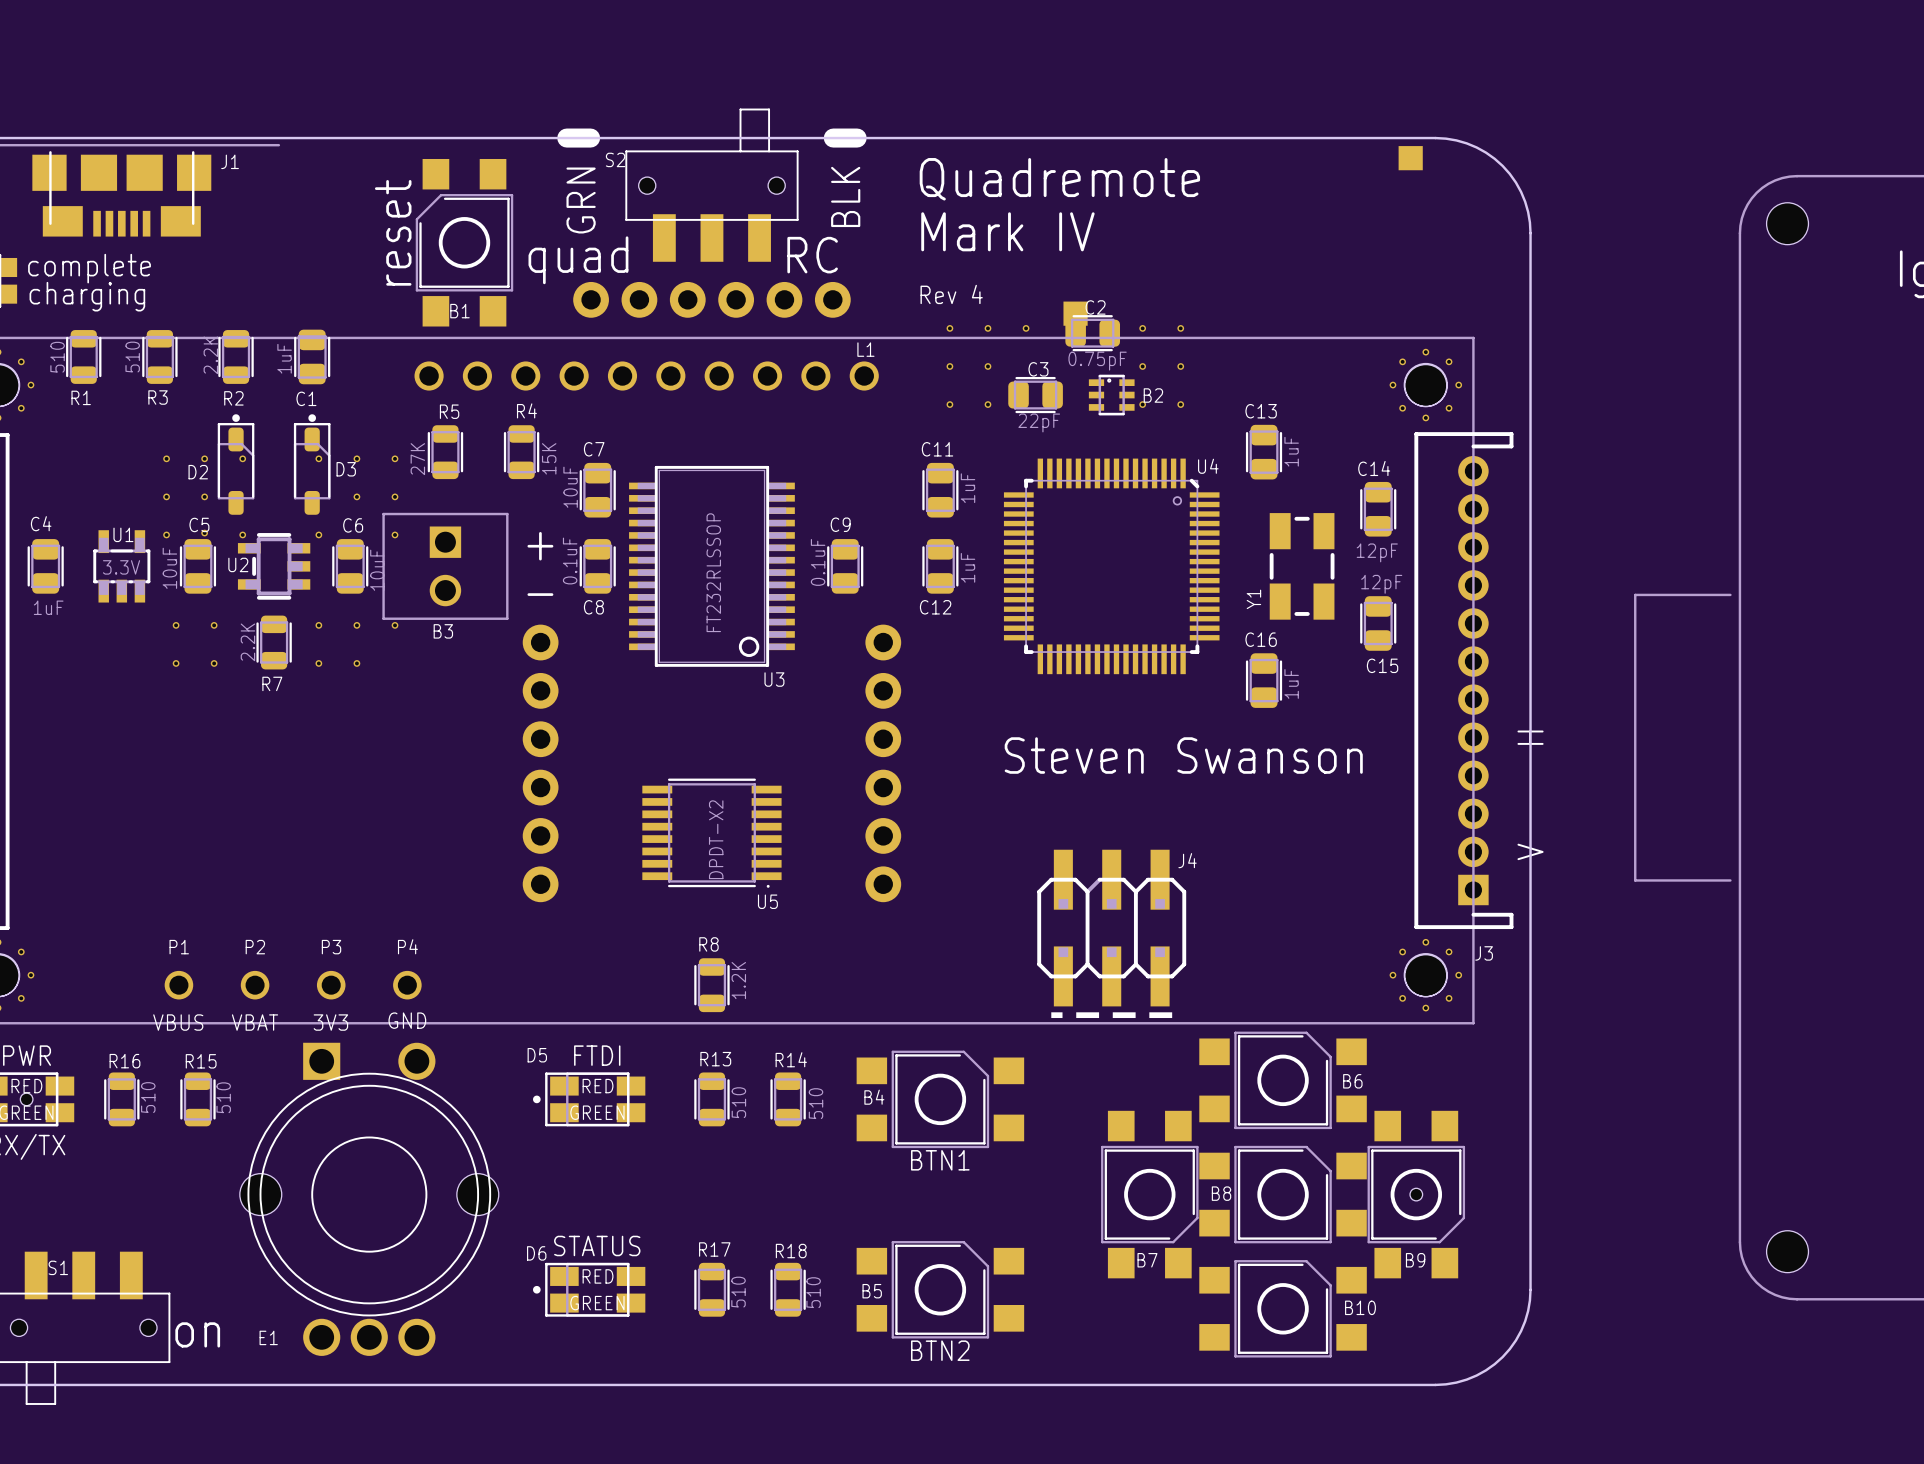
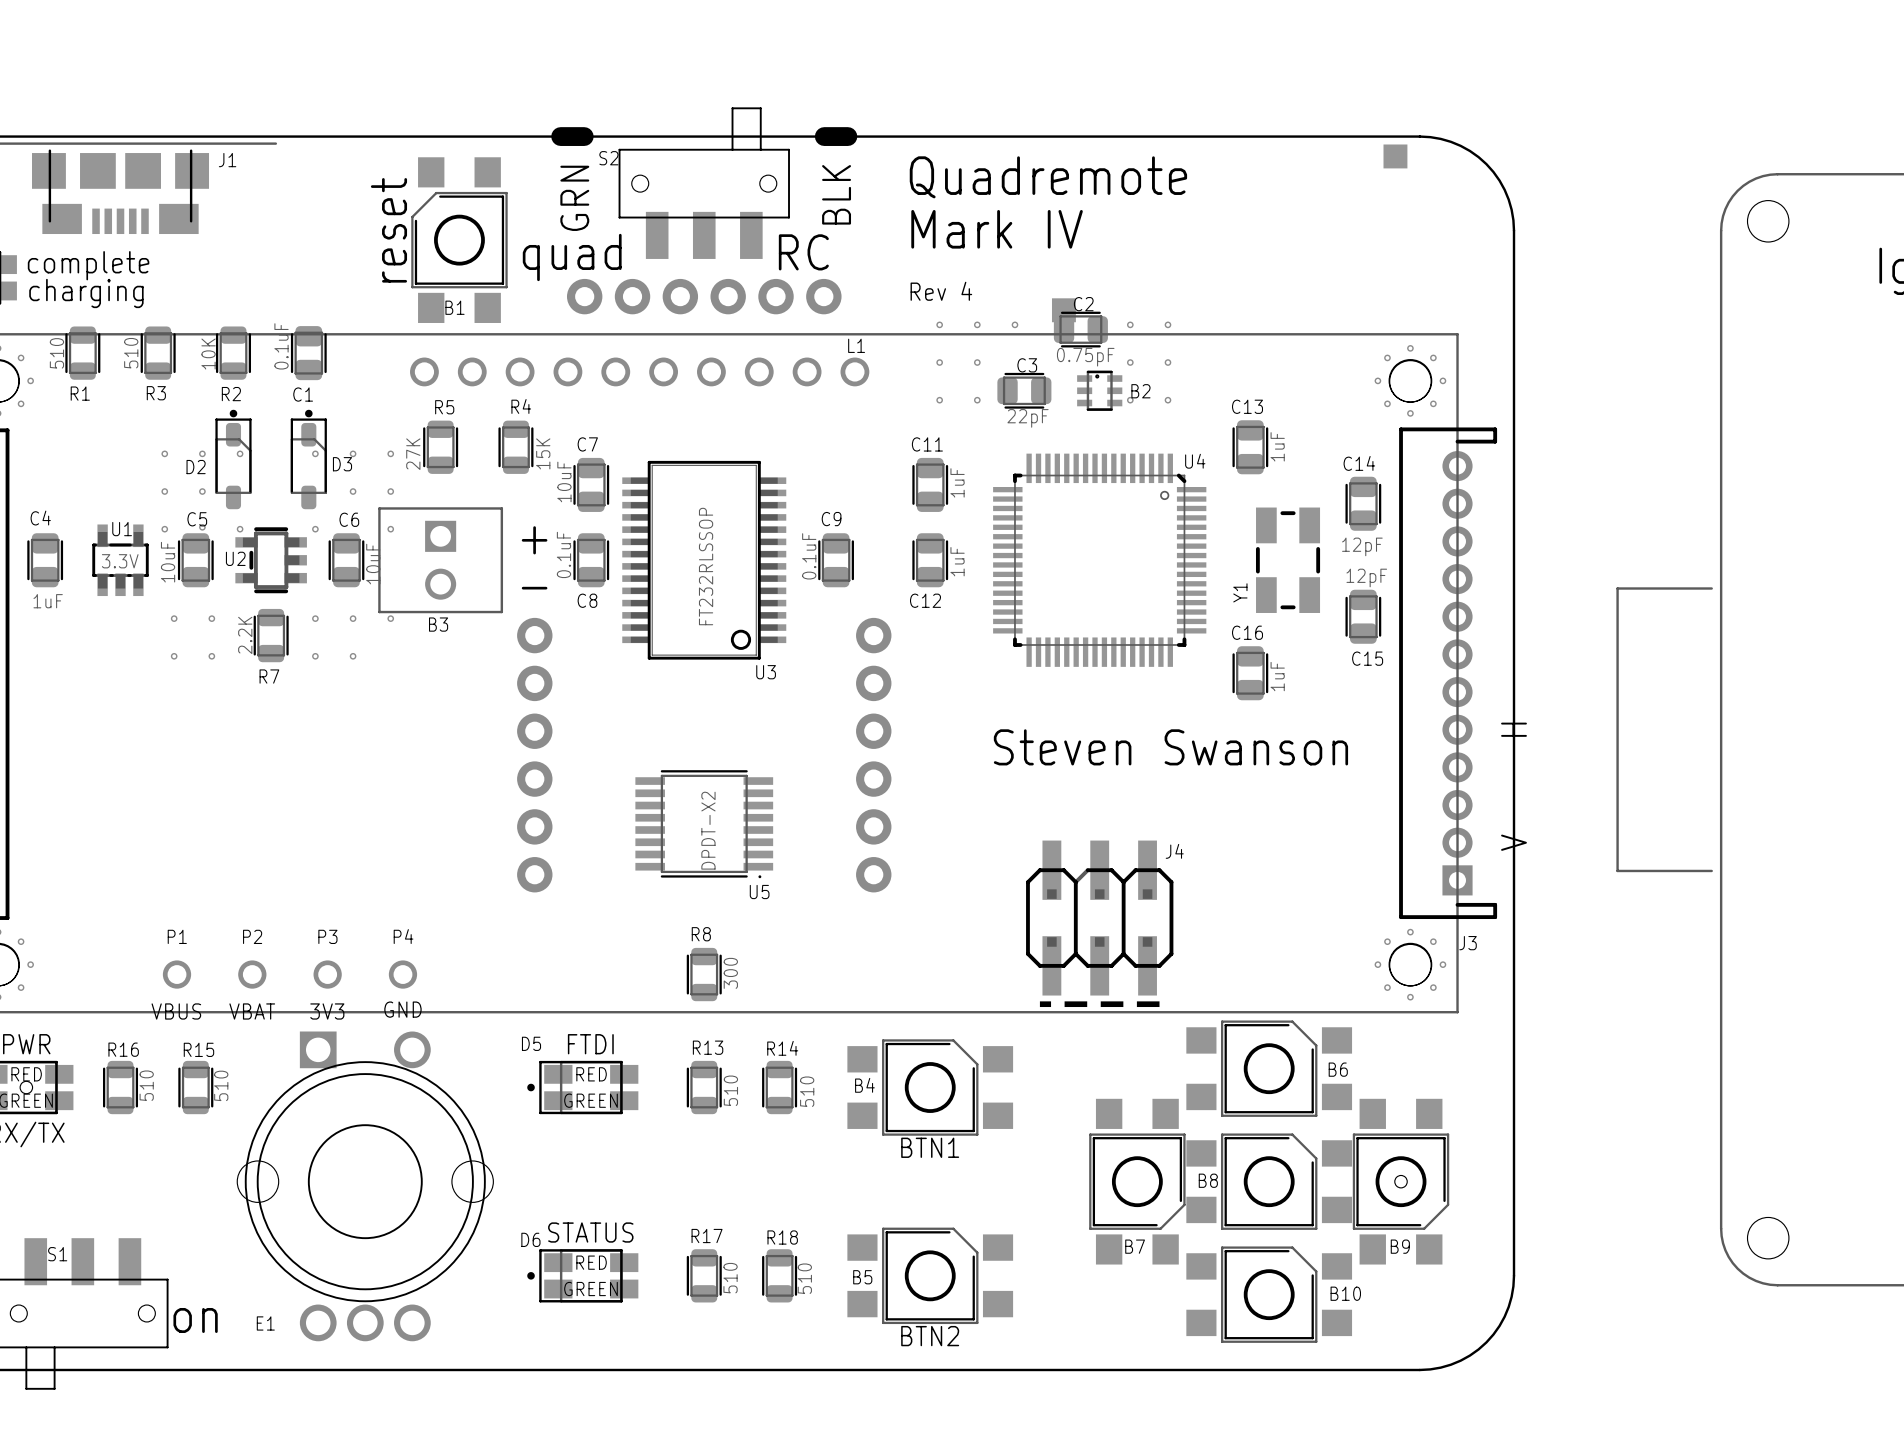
R2 value: 2.2K (210, 355) -> 10K (208, 354)
C1 value: 1uF (284, 358) -> 0.1uF (281, 346)
R8 value: 1.2K (738, 980) -> 300 (730, 973)

